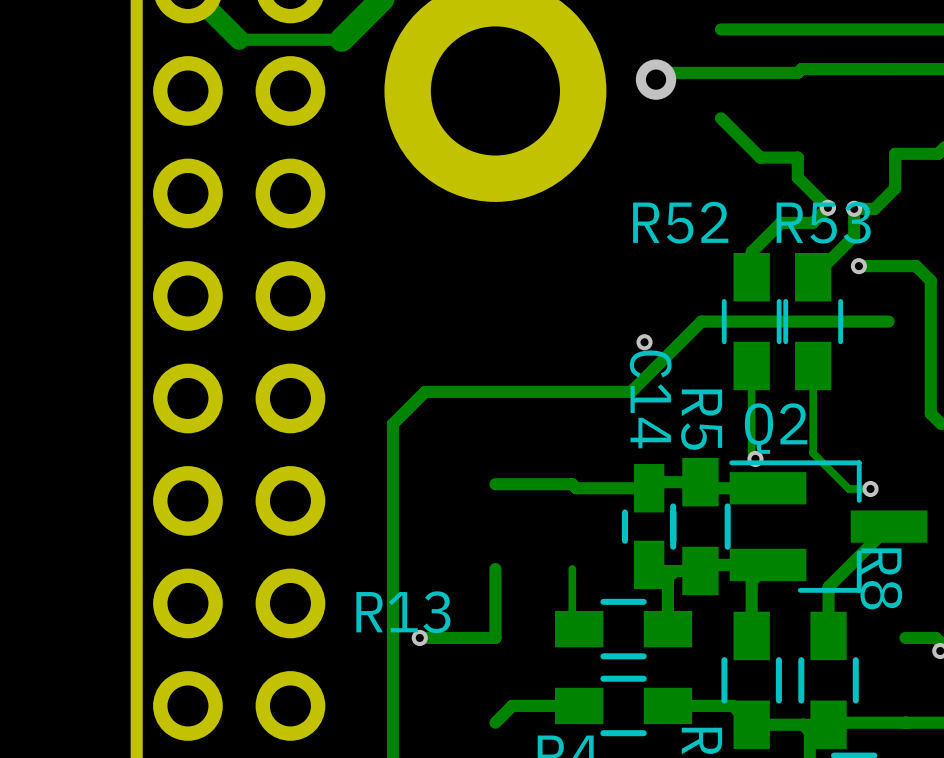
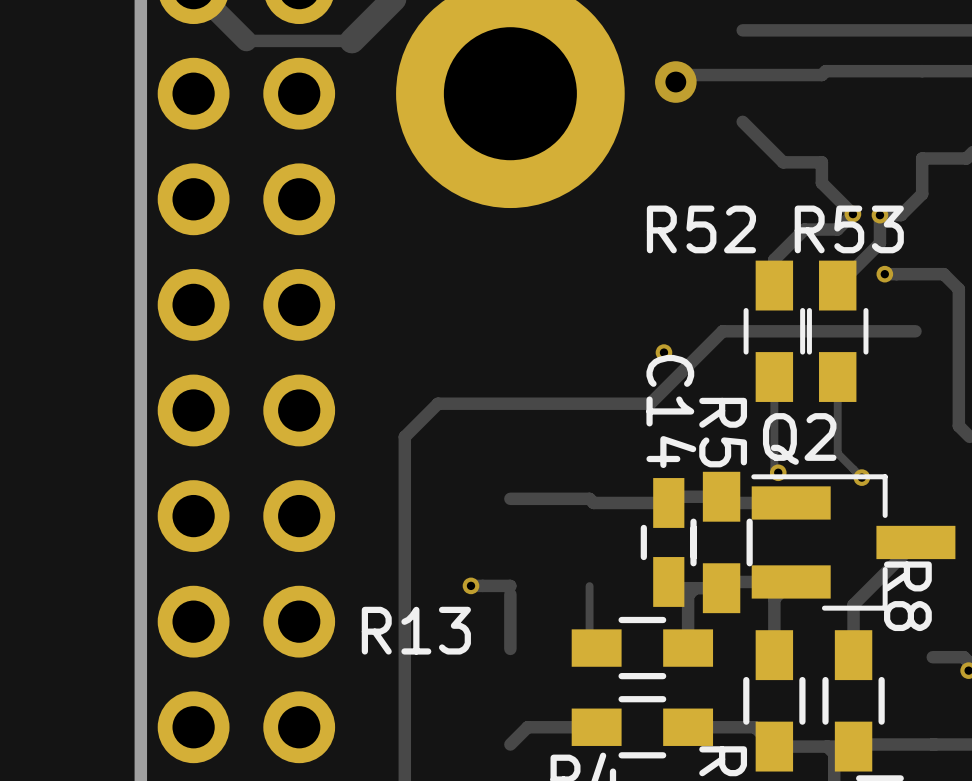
track: (813, 440) (813, 453) (848, 488) (870, 488) -> (837, 453) (861, 477)
via position: (870, 488) -> (861, 477)
track: (495, 568) (495, 577) -> (510, 585) (471, 585)
track: (495, 629) (495, 637) (419, 637) -> none
via position: (419, 637) -> (471, 585)

